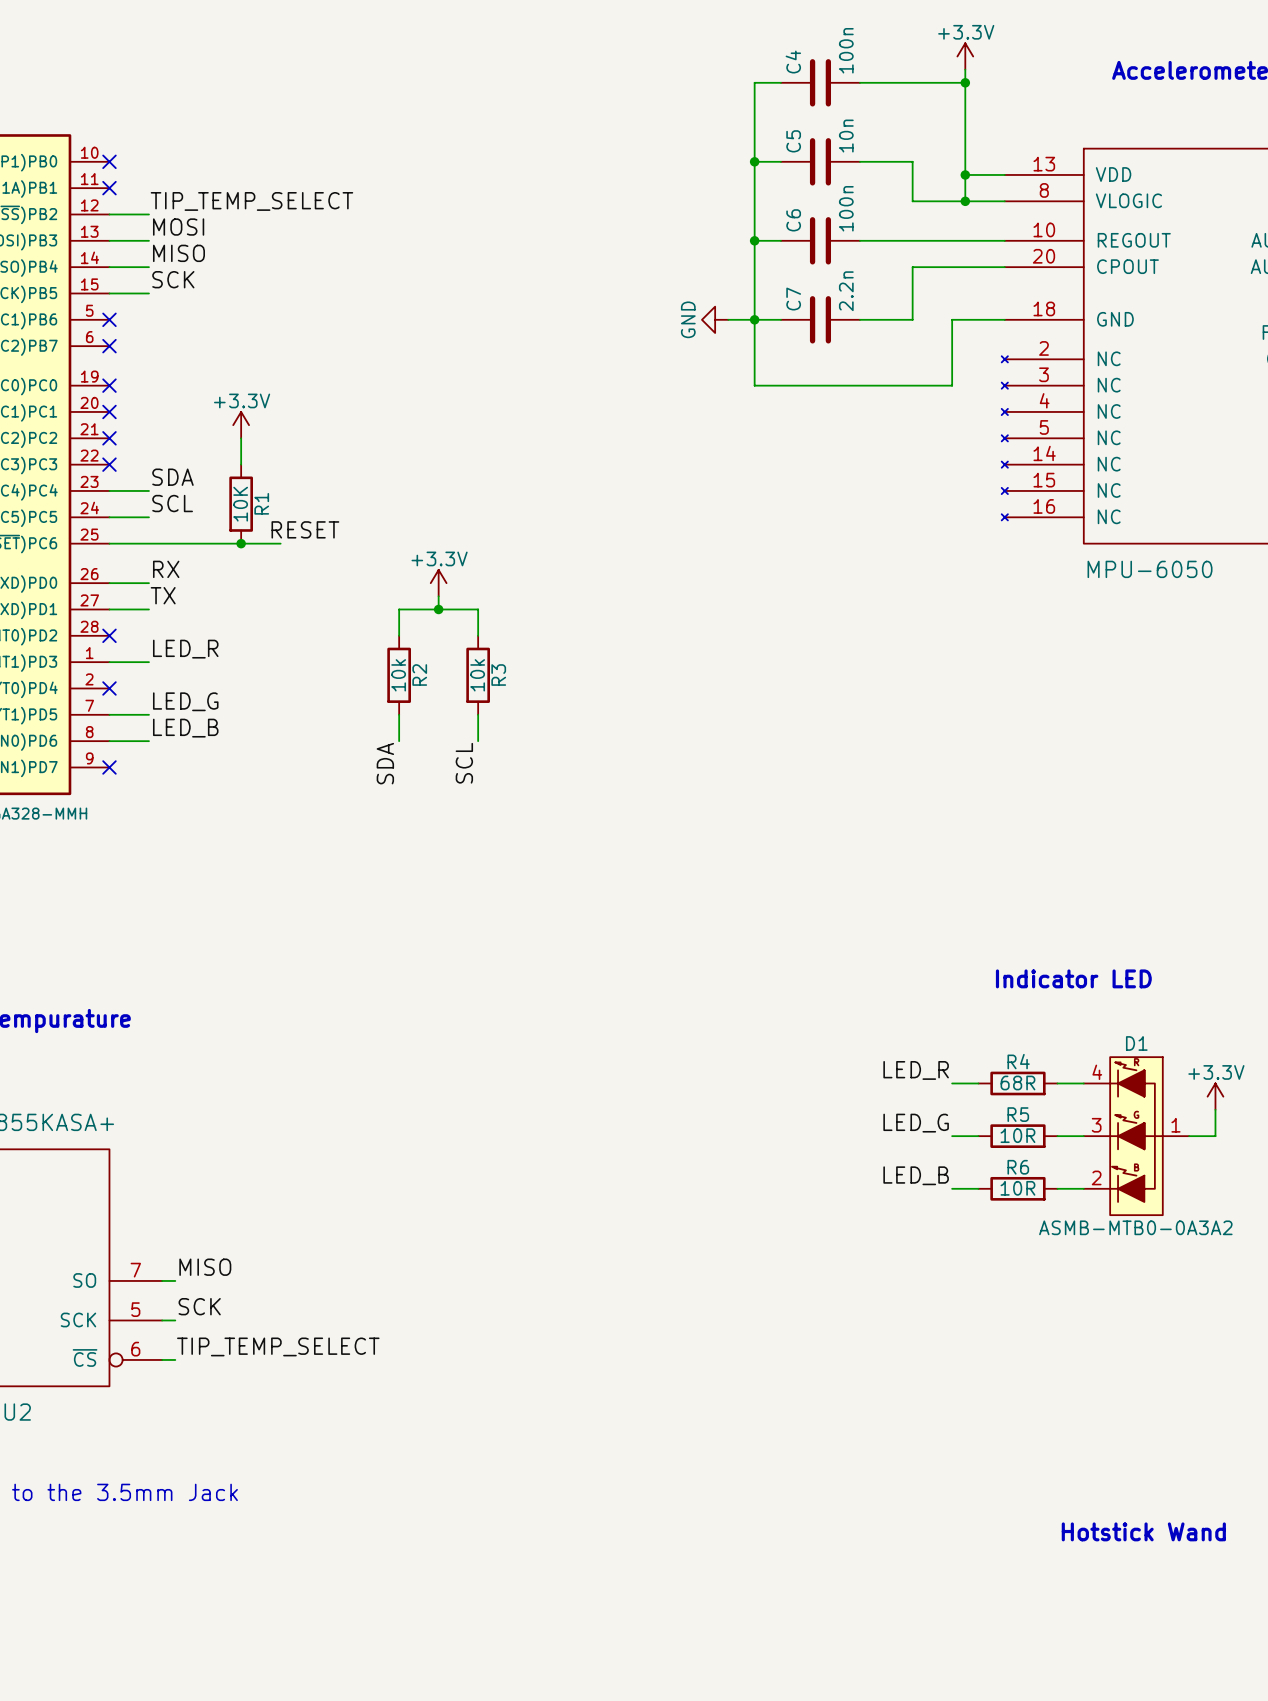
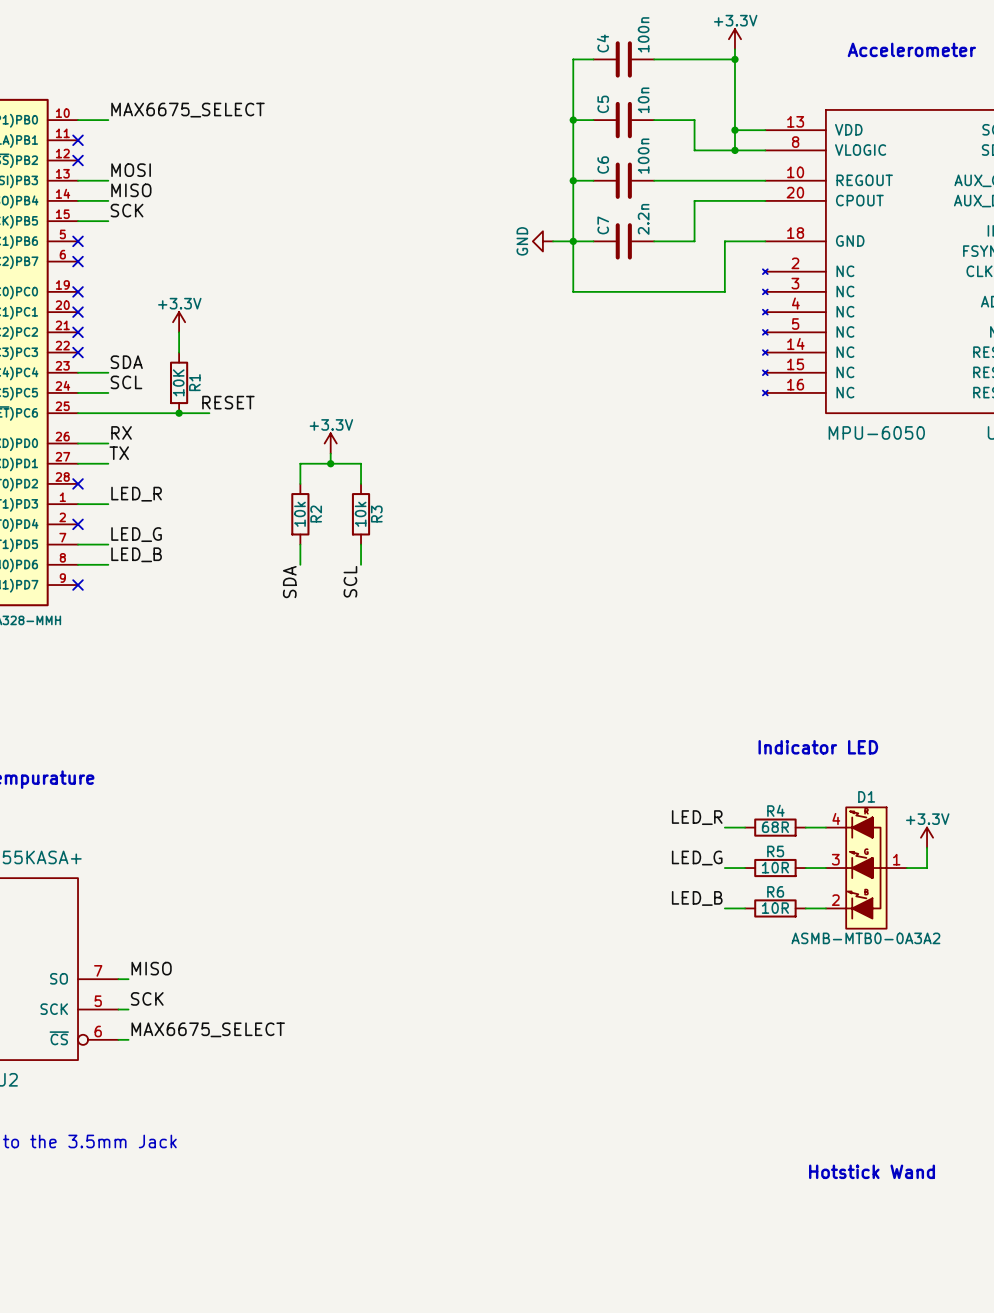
label: none -> MAX6675_SELECT (187, 110)
no-connect mark position: (109, 161) -> (78, 160)
label: TIP_TEMP_SELECT (251, 201) -> none
wire: (109, 214) (148, 214) -> (78, 120) (108, 120)
label: TIP_TEMP_SELECT (278, 1346) -> MAX6675_SELECT (208, 1029)

